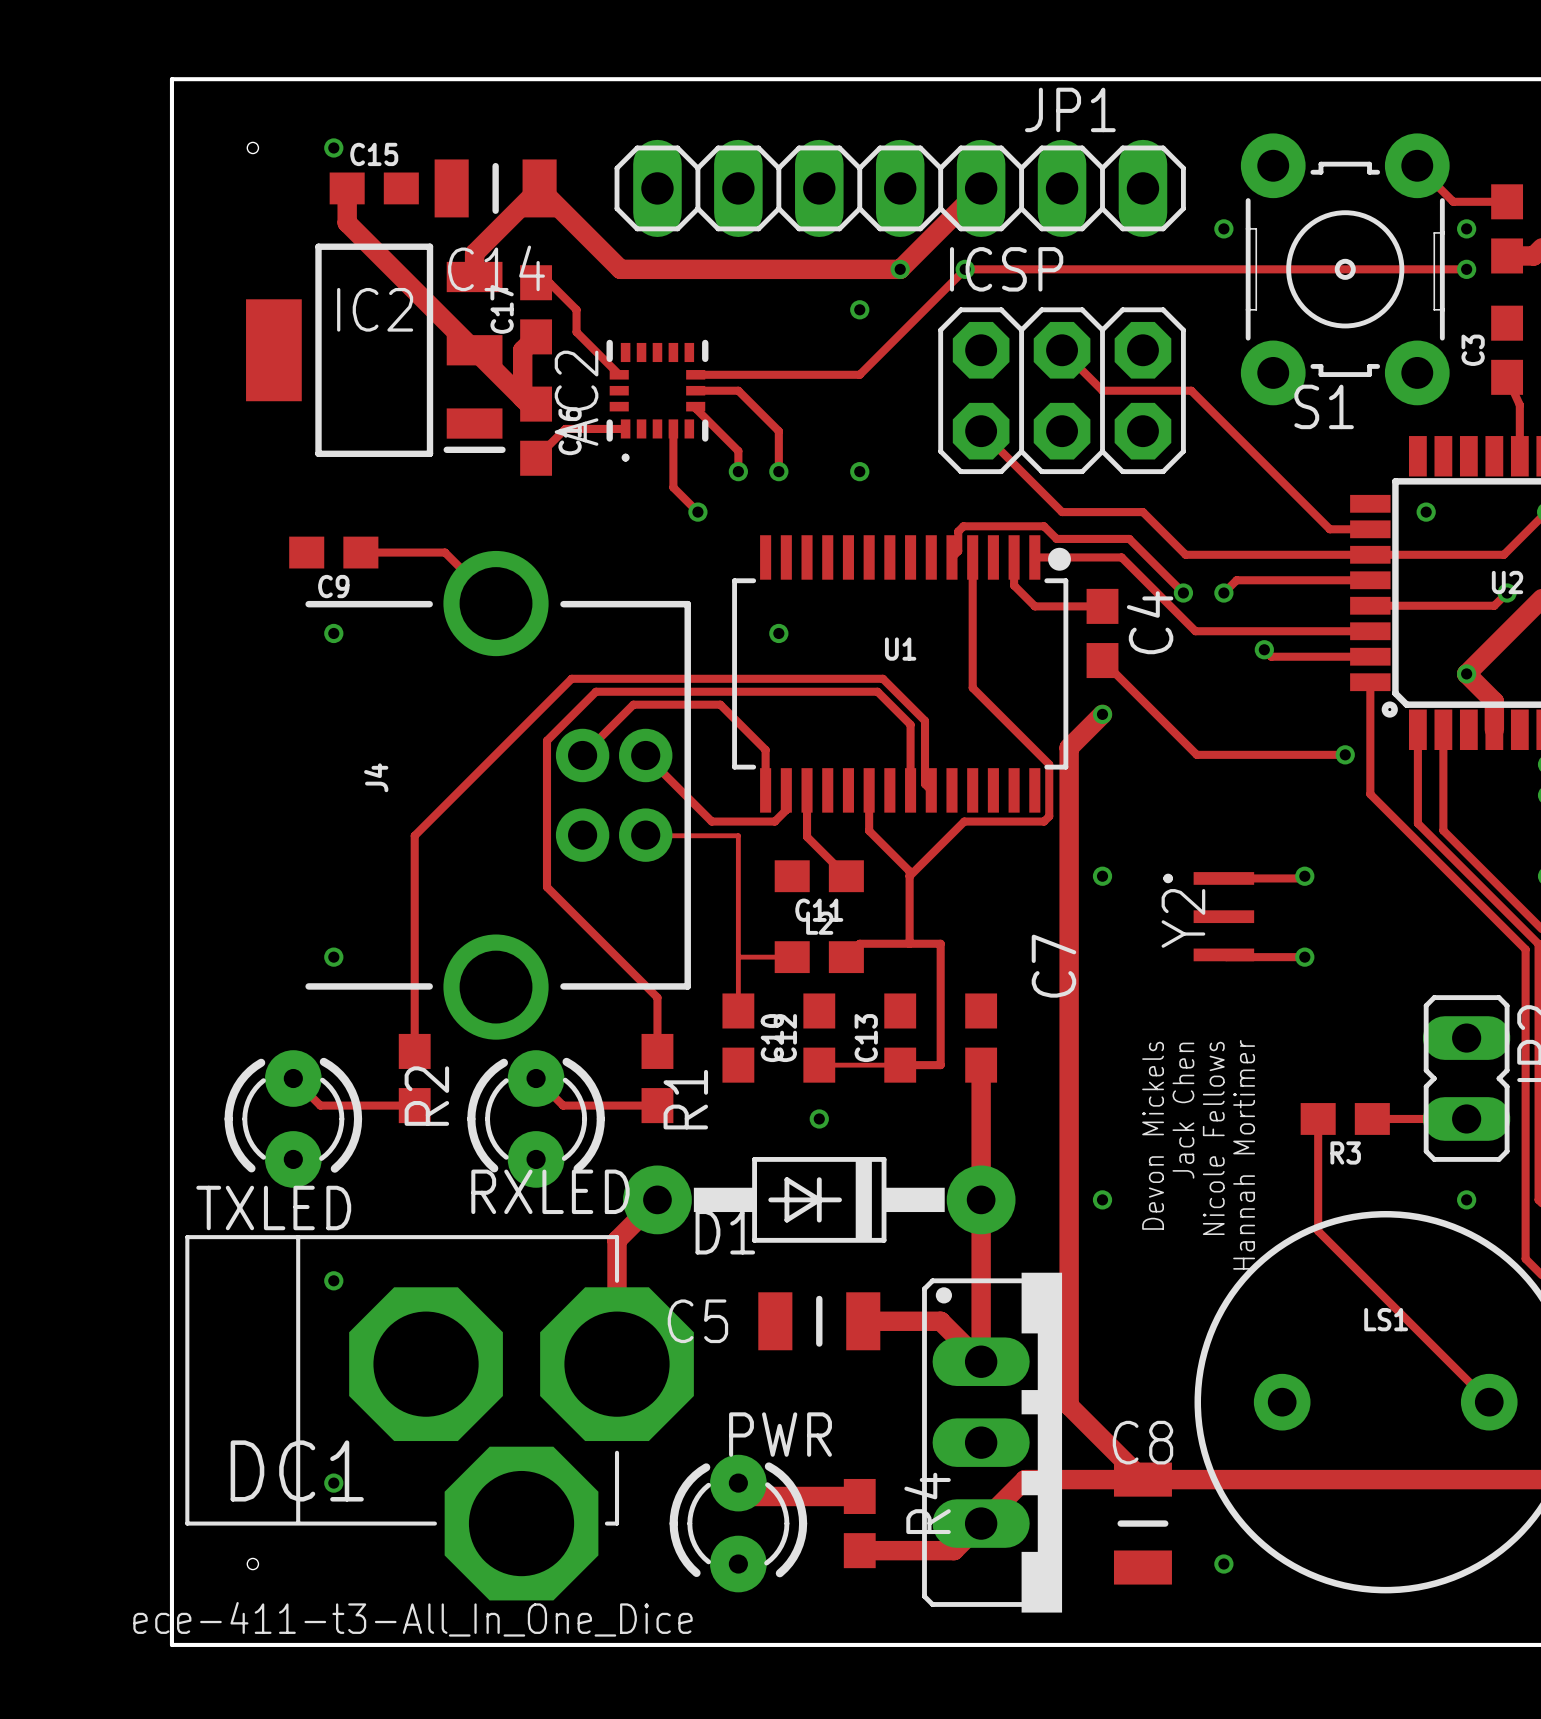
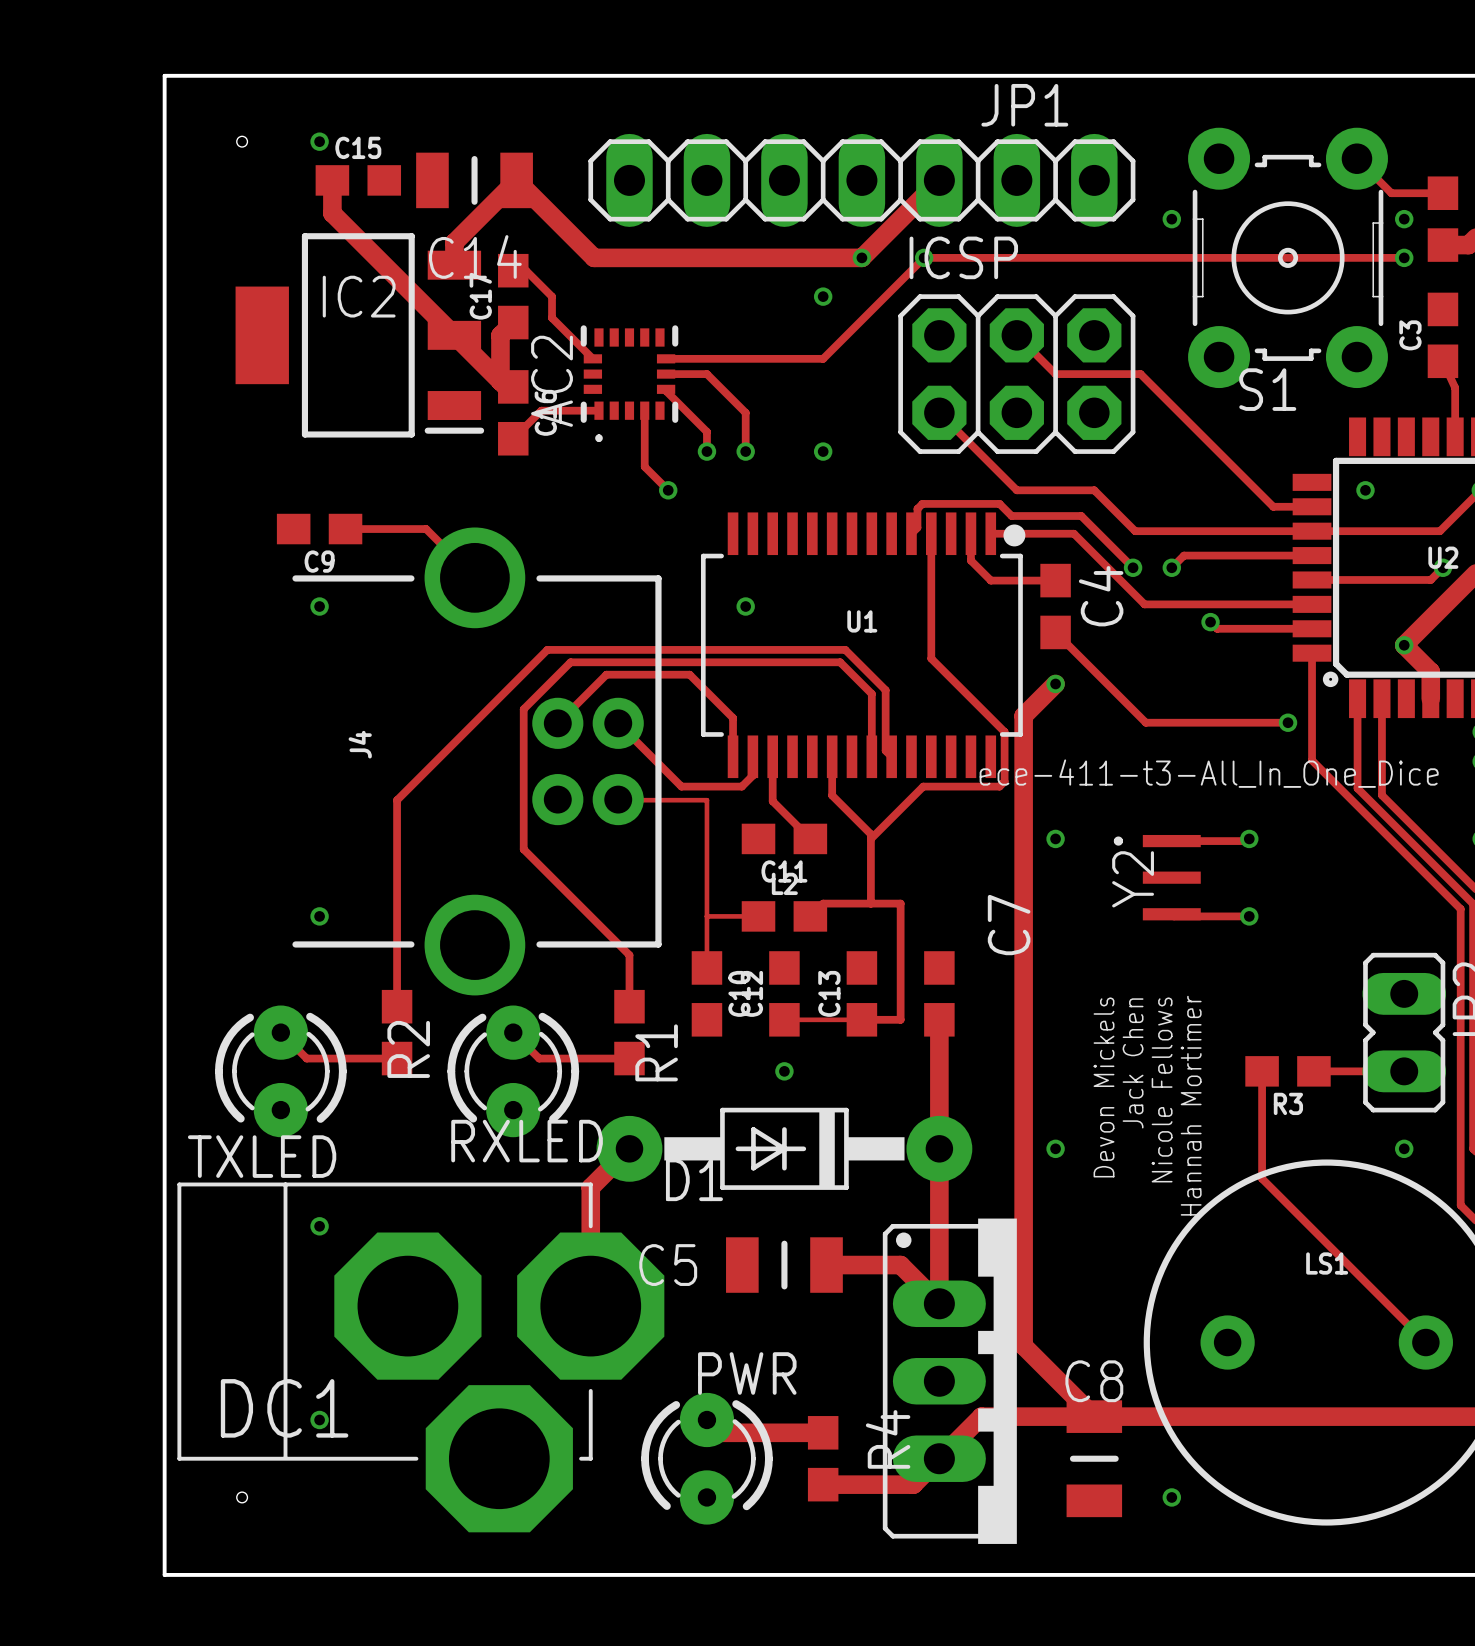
text: none -> ece-411-t3-All_In_One_Dice (1209, 773)
text: ece-411-t3-All_In_One_Dice (413, 1619) -> none

